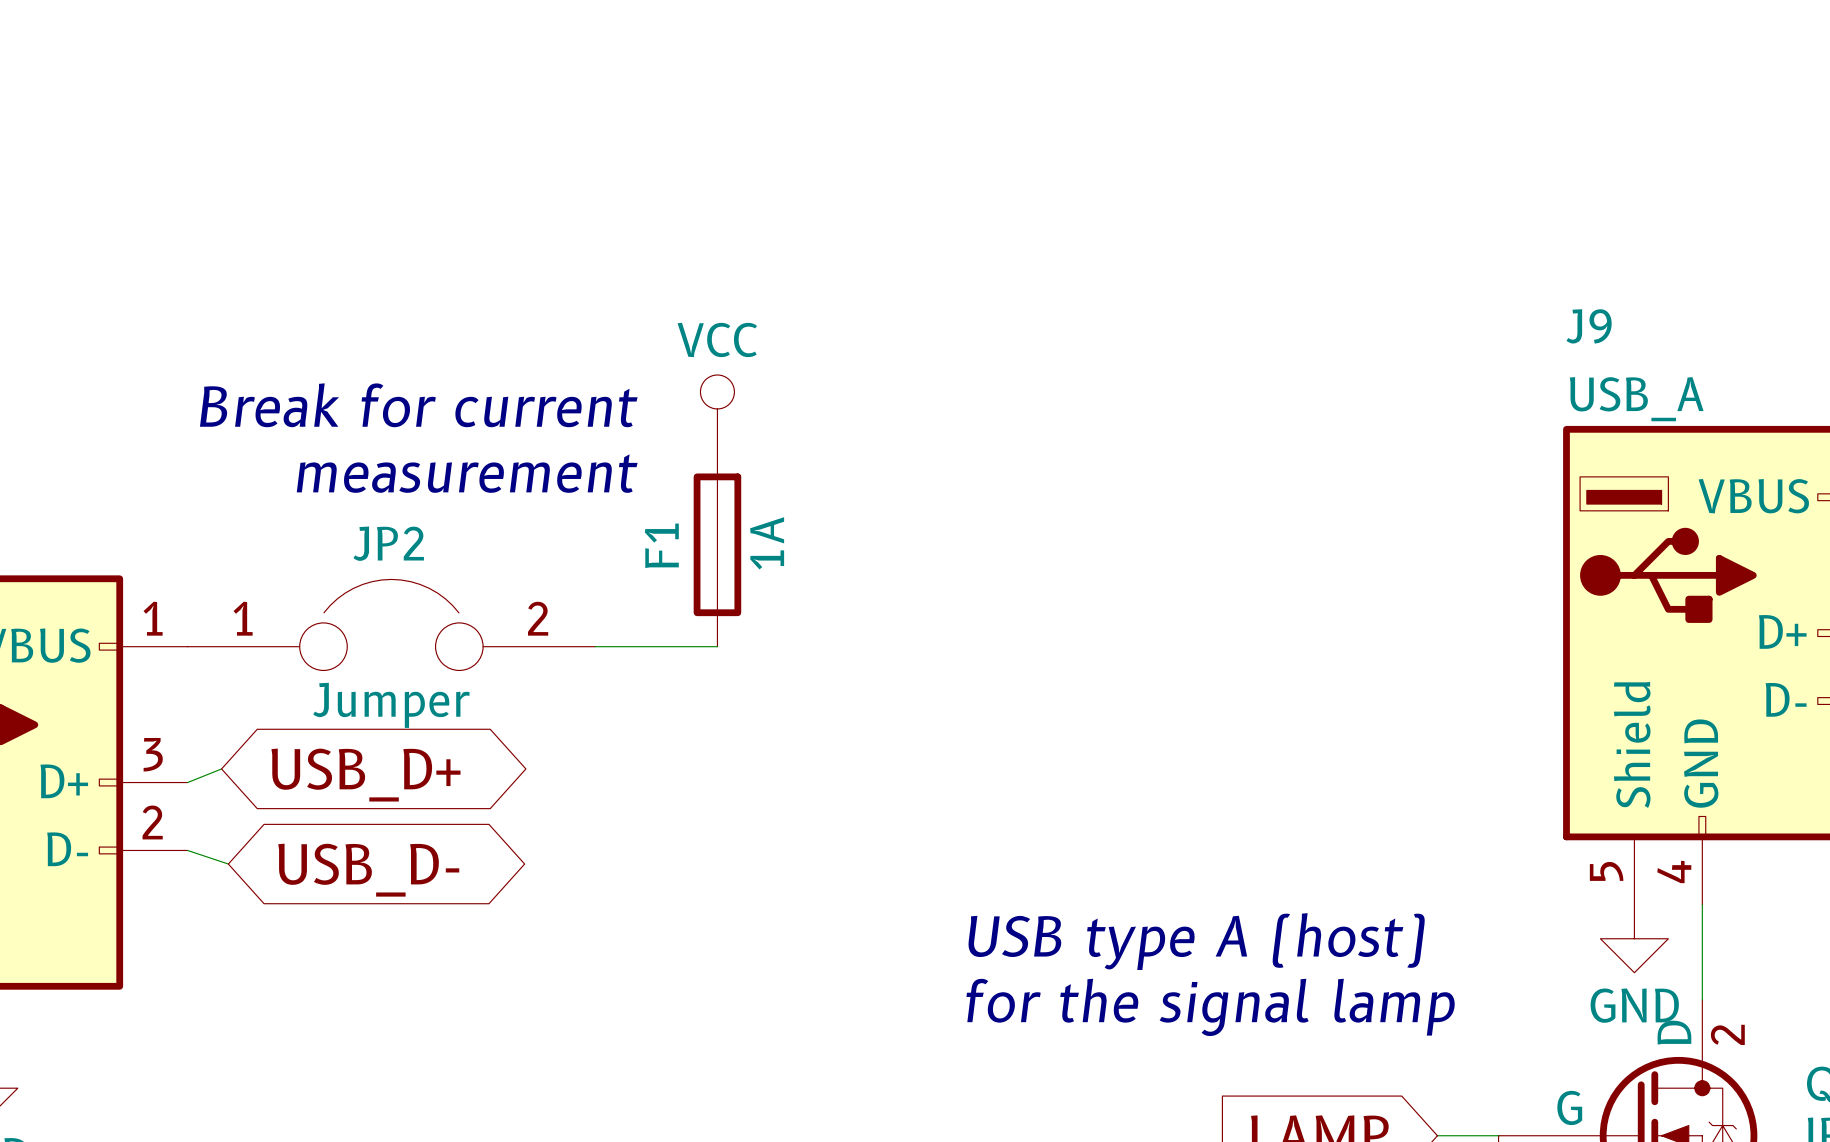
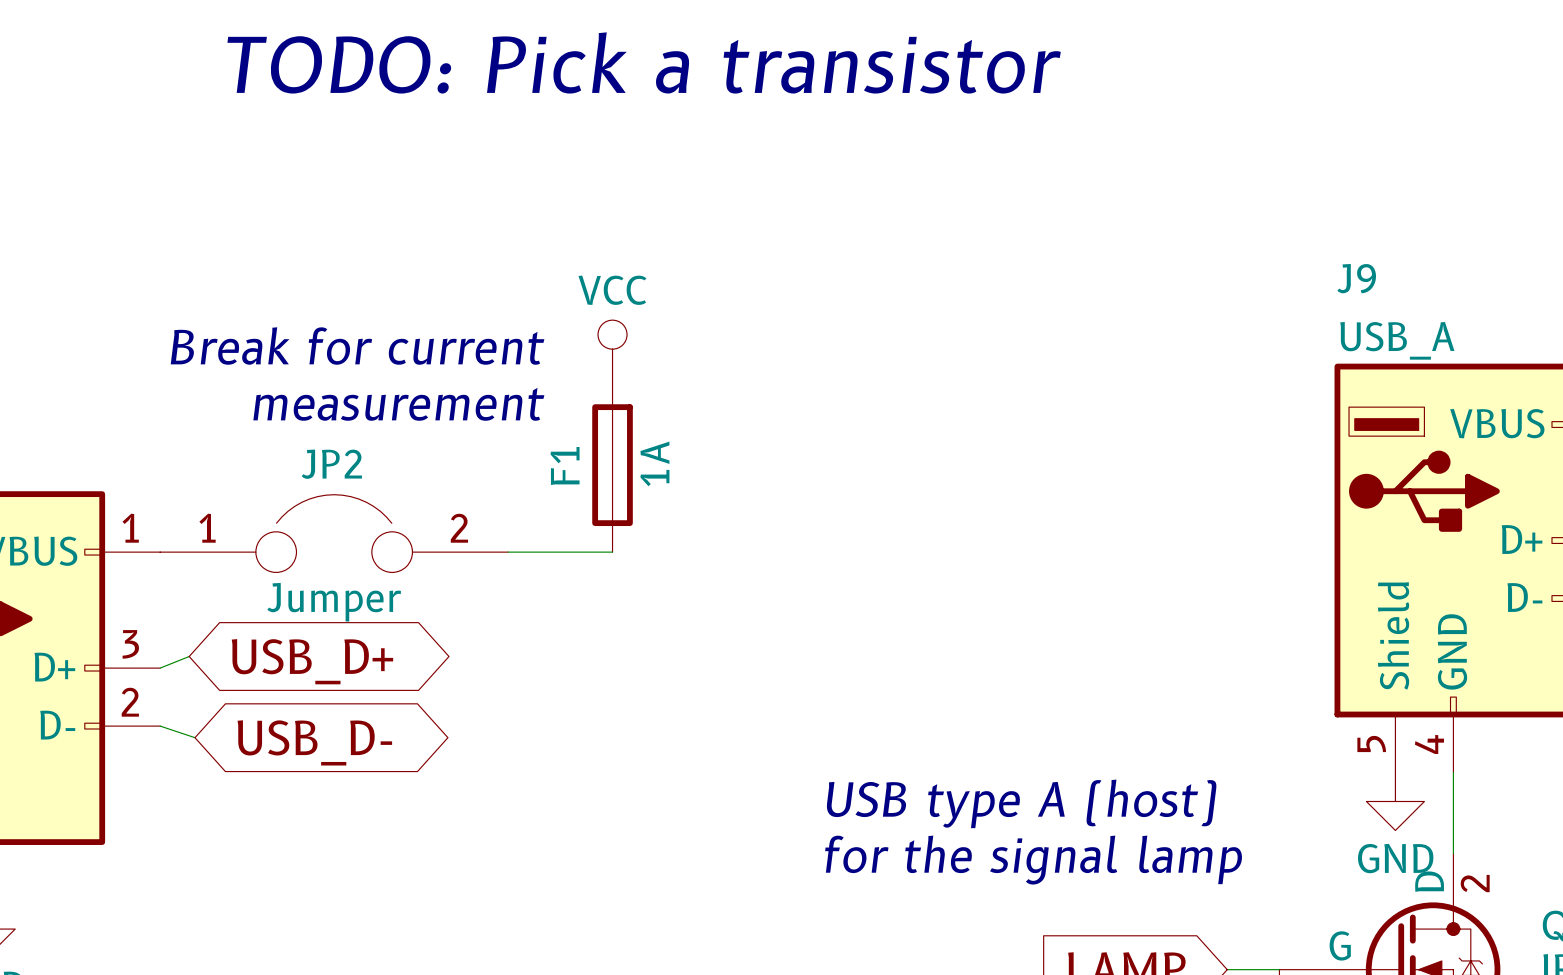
text: none -> TODO: Pick a transistor (644, 62)

